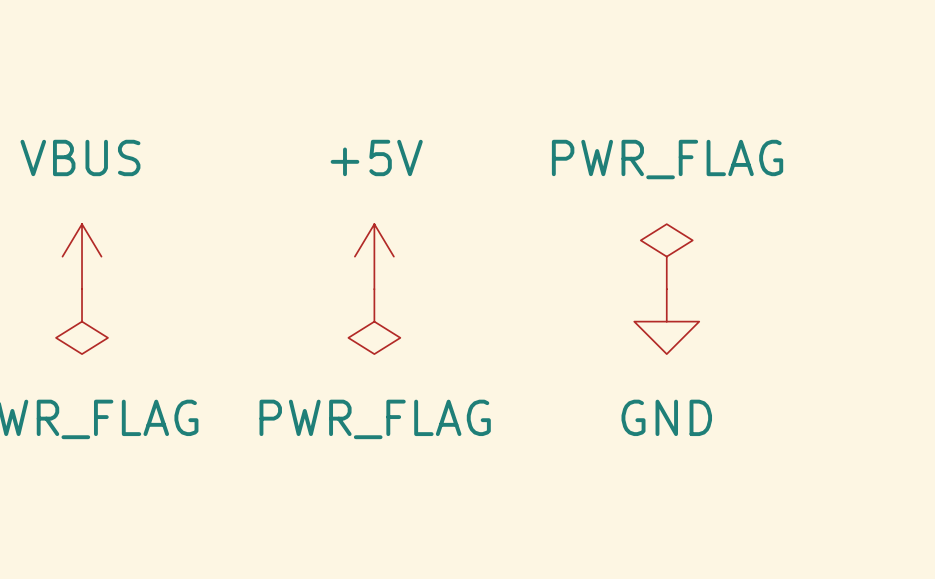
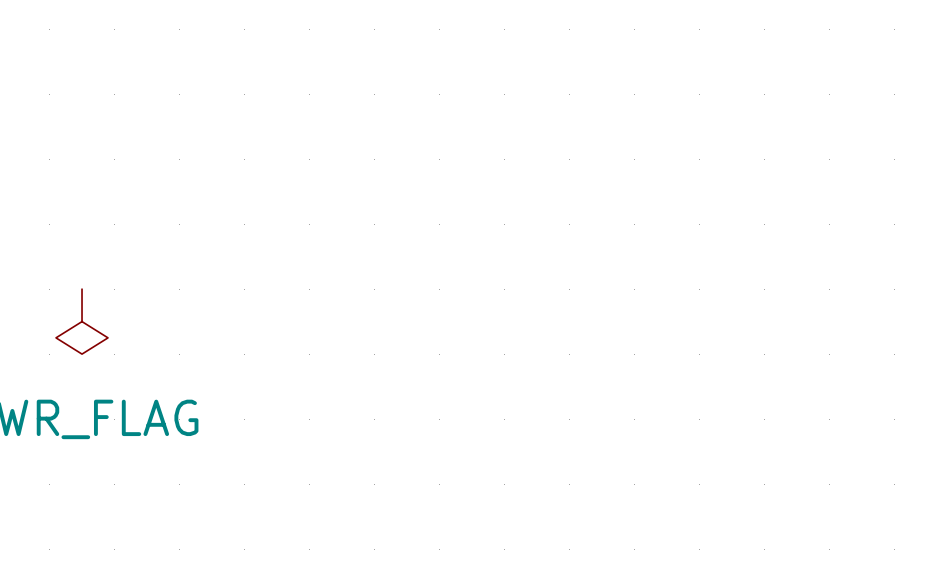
power symbol: VBUS (82, 256) -> none
power symbol: +5V (374, 256) -> none
power symbol: PWR_FLAG (666, 256) -> none
power symbol: PWR_FLAG (374, 321) -> none
power symbol: GND (666, 321) -> none

